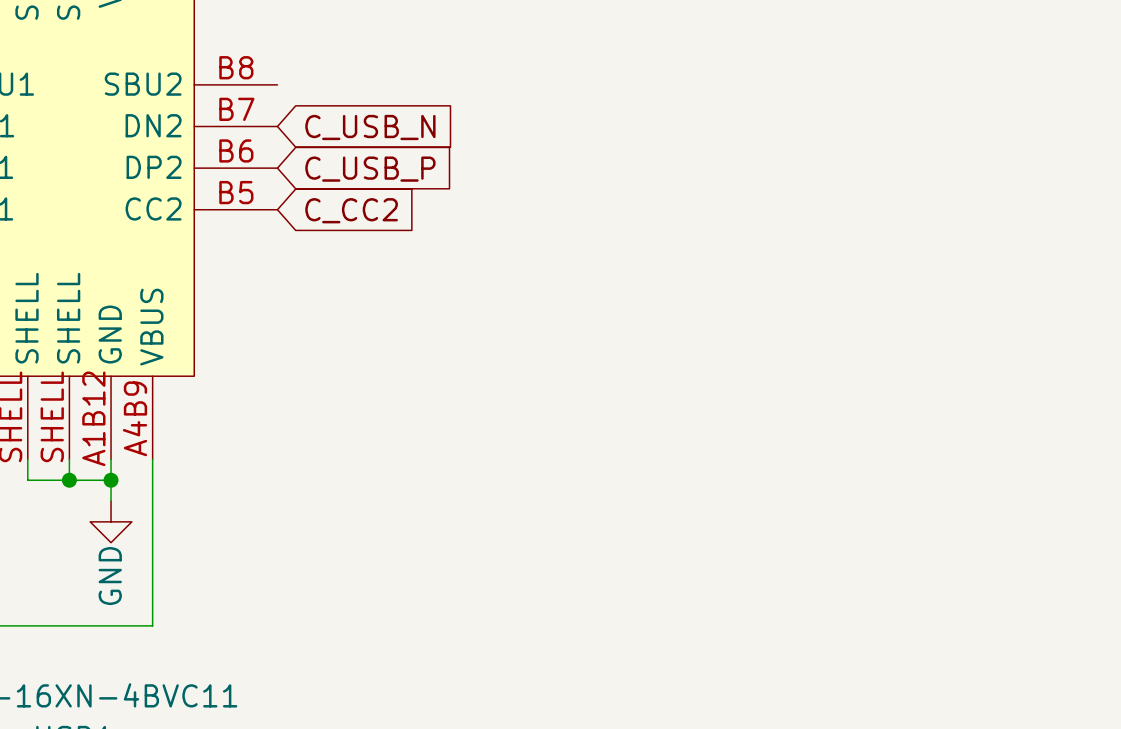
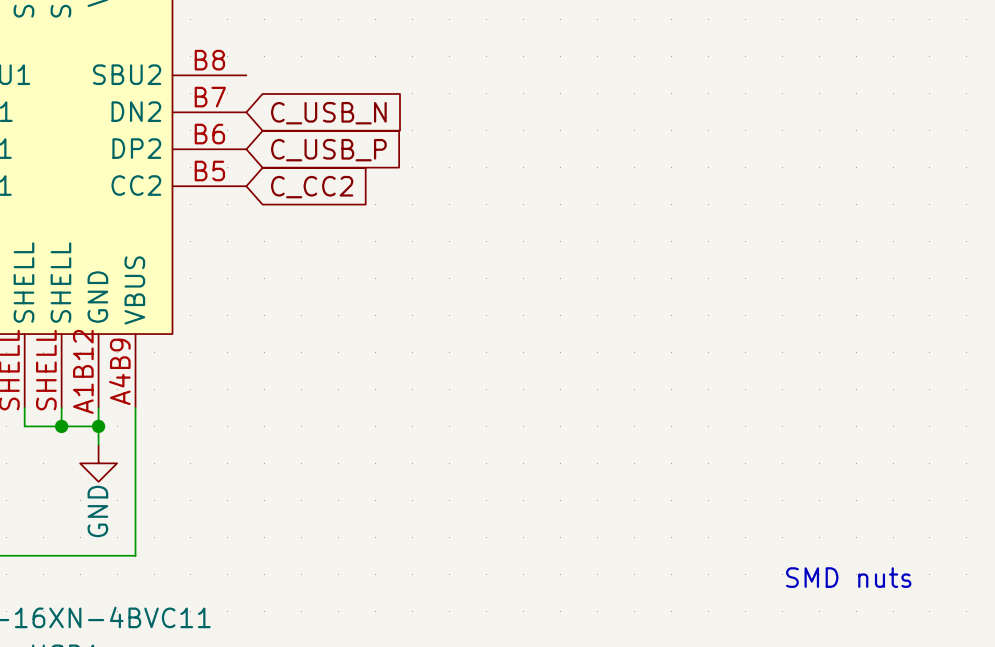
text: none -> SMD nuts (848, 577)

